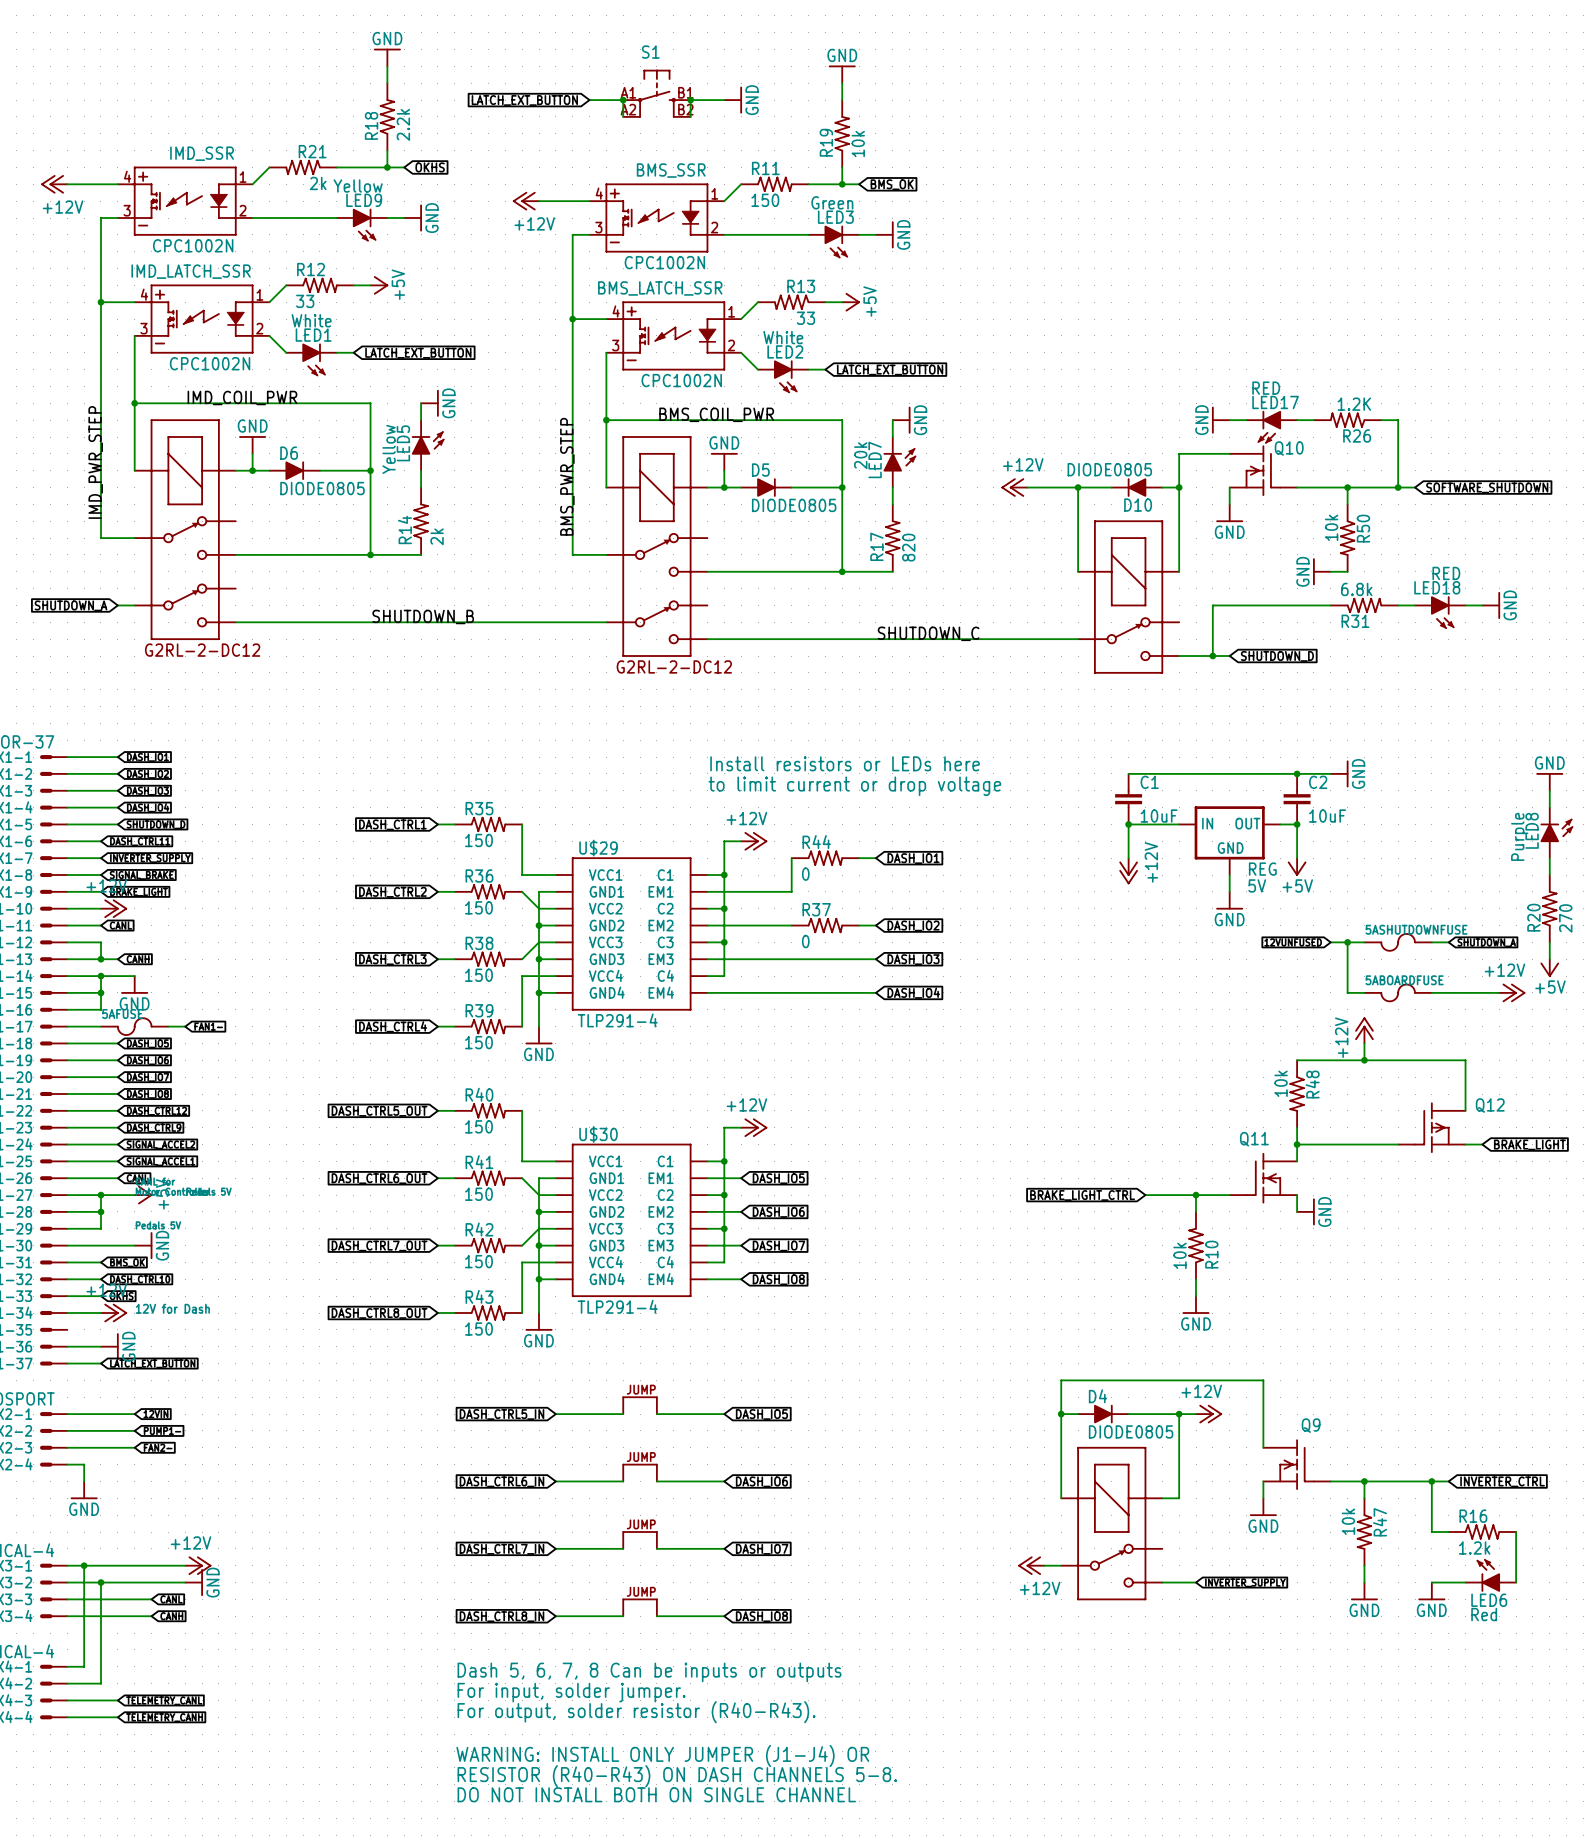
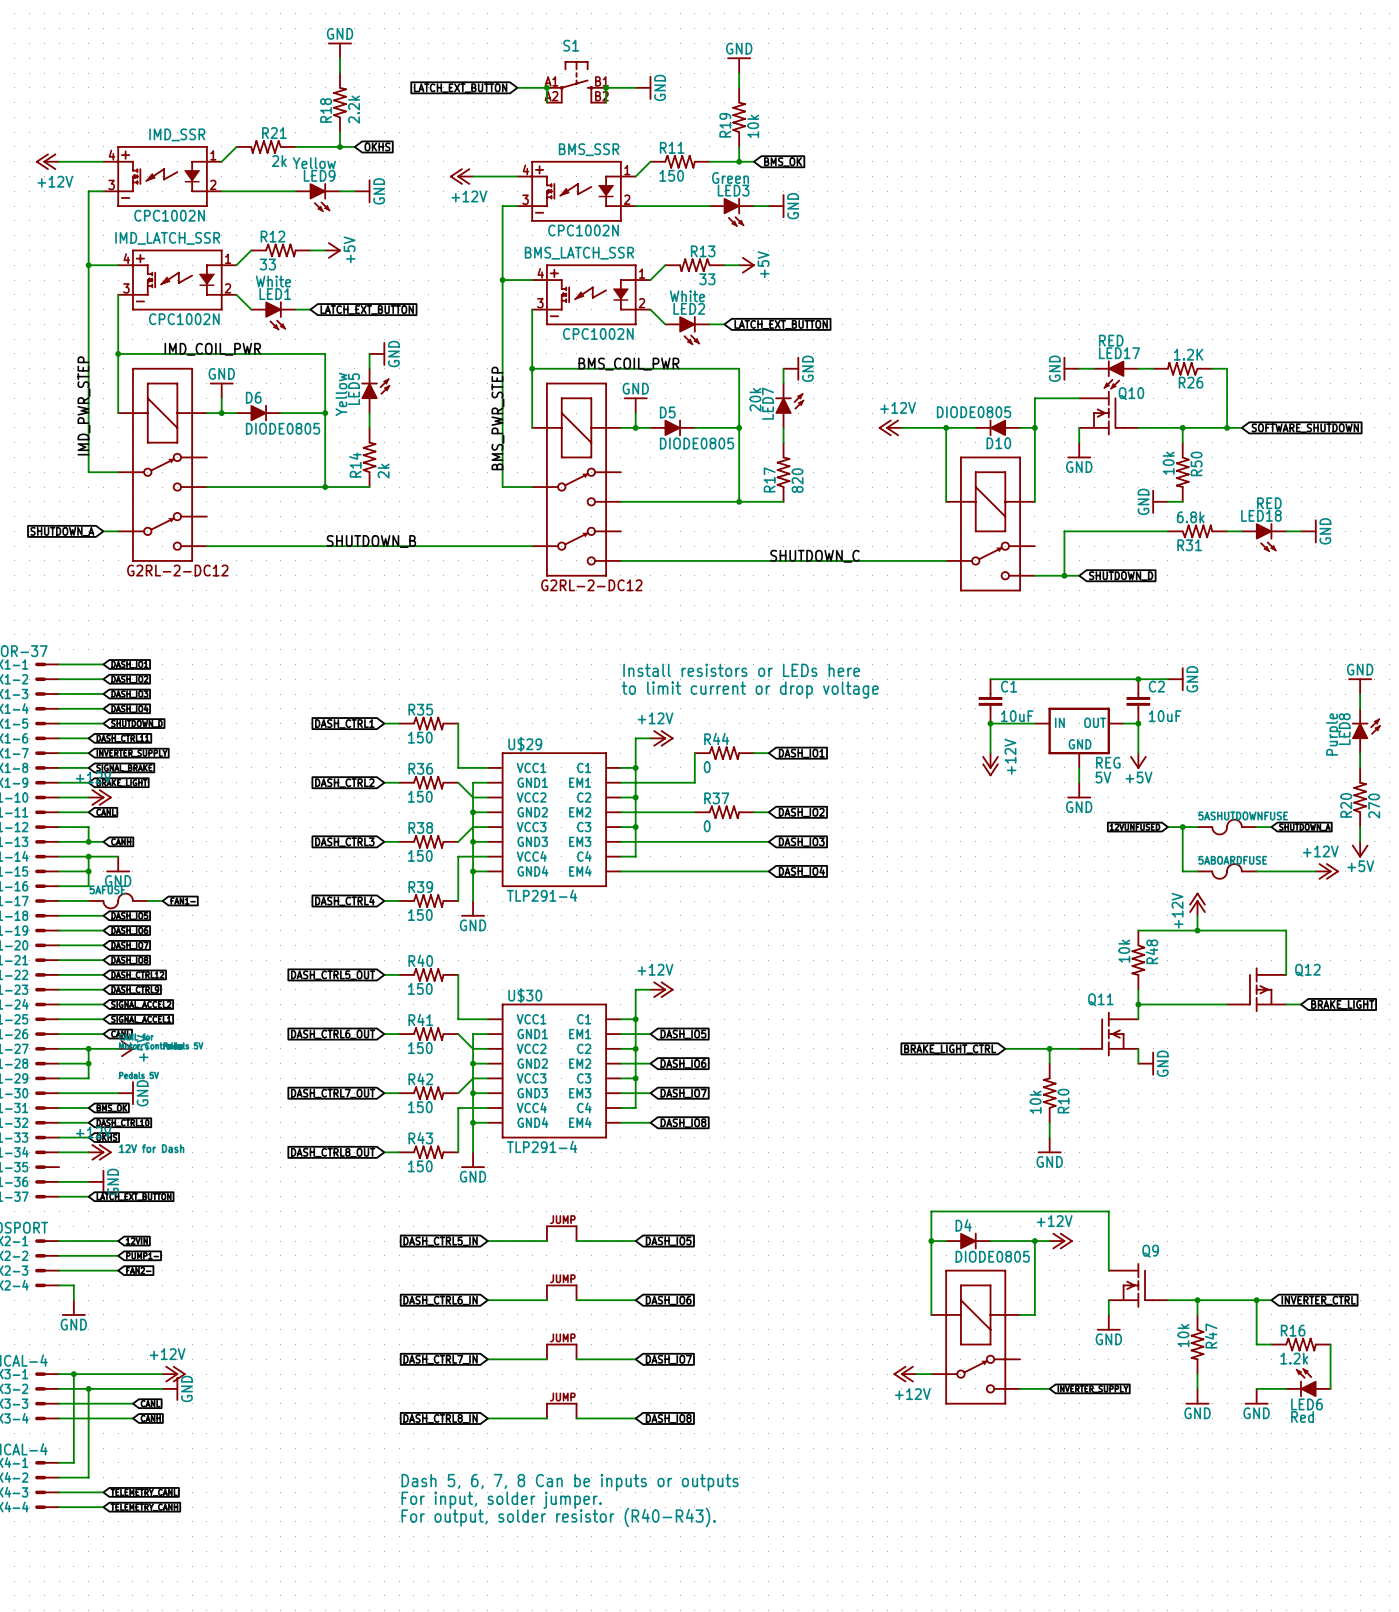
text: Dash 5, 6, 7, 8 Can be inputs or outputs (649, 1672) -> none
text: For input, solder jumper. (571, 1692) -> Dash 5, 6, 7, 8 Can be inputs or outputs (570, 1482)
text: For output, solder resistor (R40-R43). (636, 1712) -> For input, solder jumper. (501, 1500)
text: none -> For output, solder resistor (R40-R43). (558, 1517)
text: WARNING: INSTALL ONLY JUMPER (J1-J4) OR (662, 1755) -> none
text: RESISTOR (R40-R43) ON DASH CHANNELS 5-8. (677, 1776) -> none
text: DO NOT INSTALL BOTH ON SINGLE CHANNEL (656, 1794) -> none

